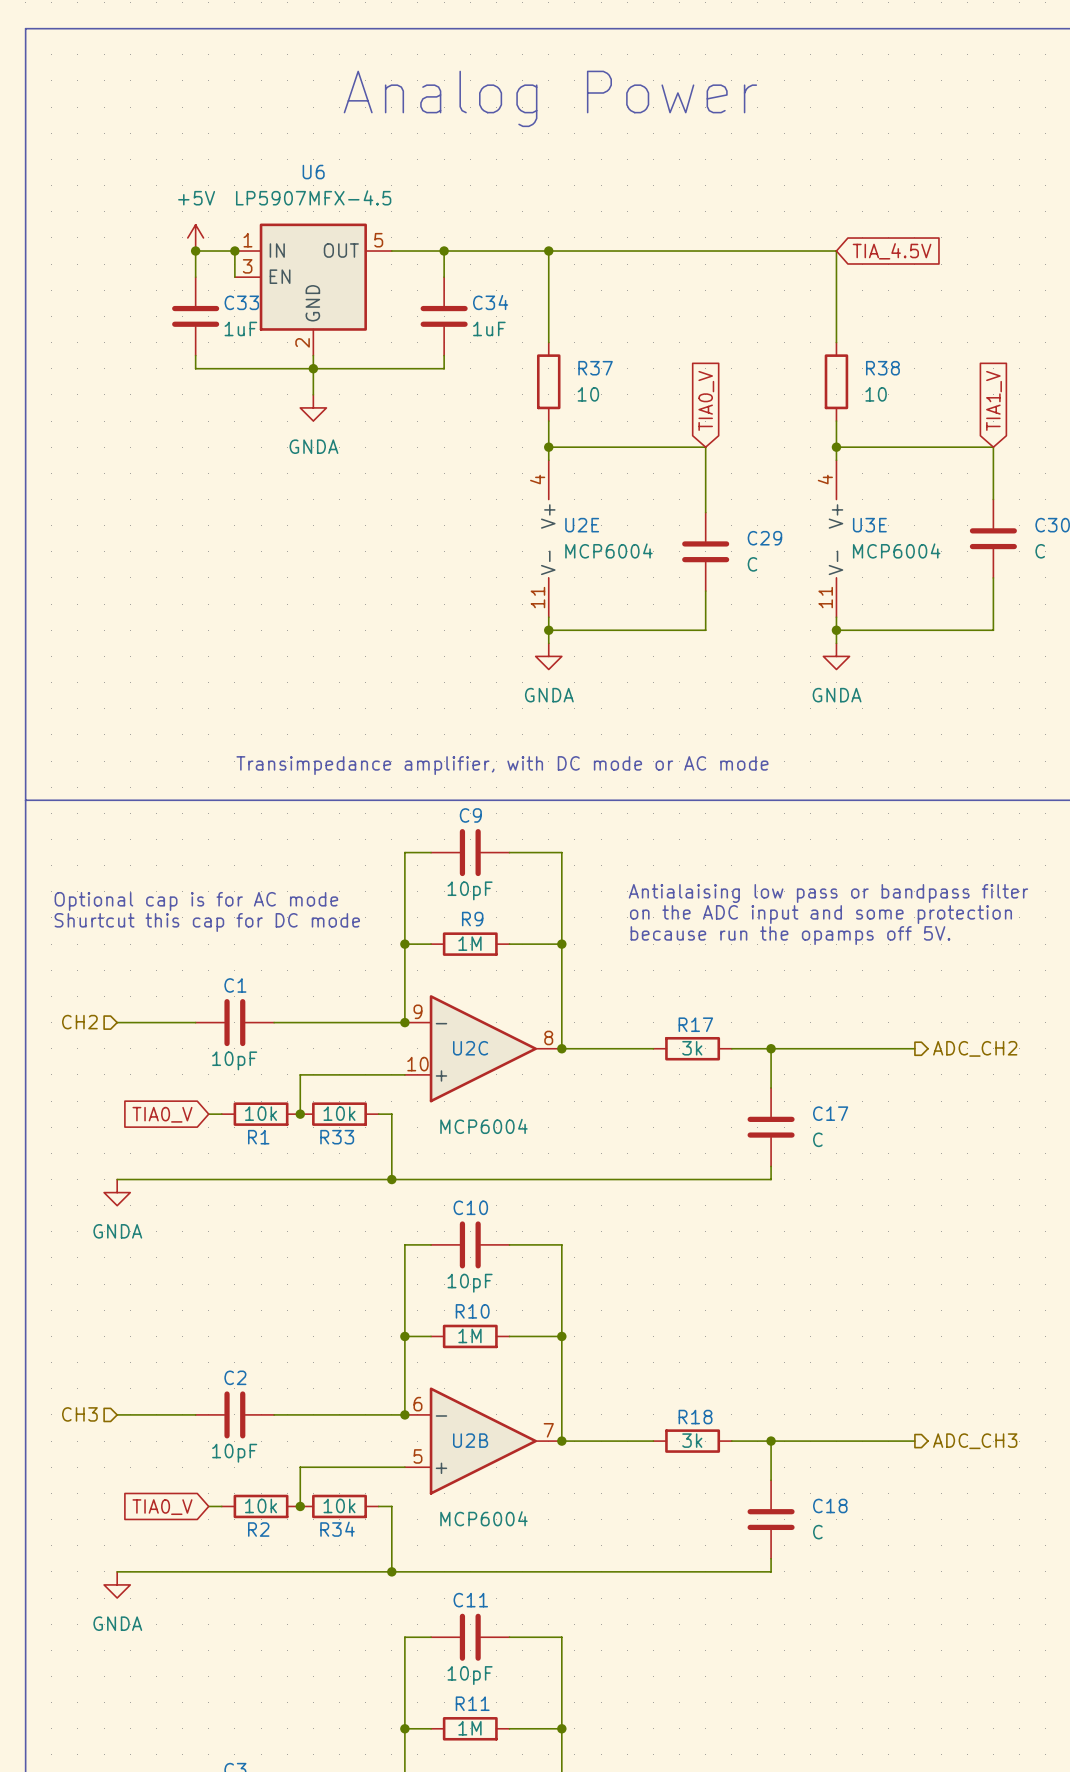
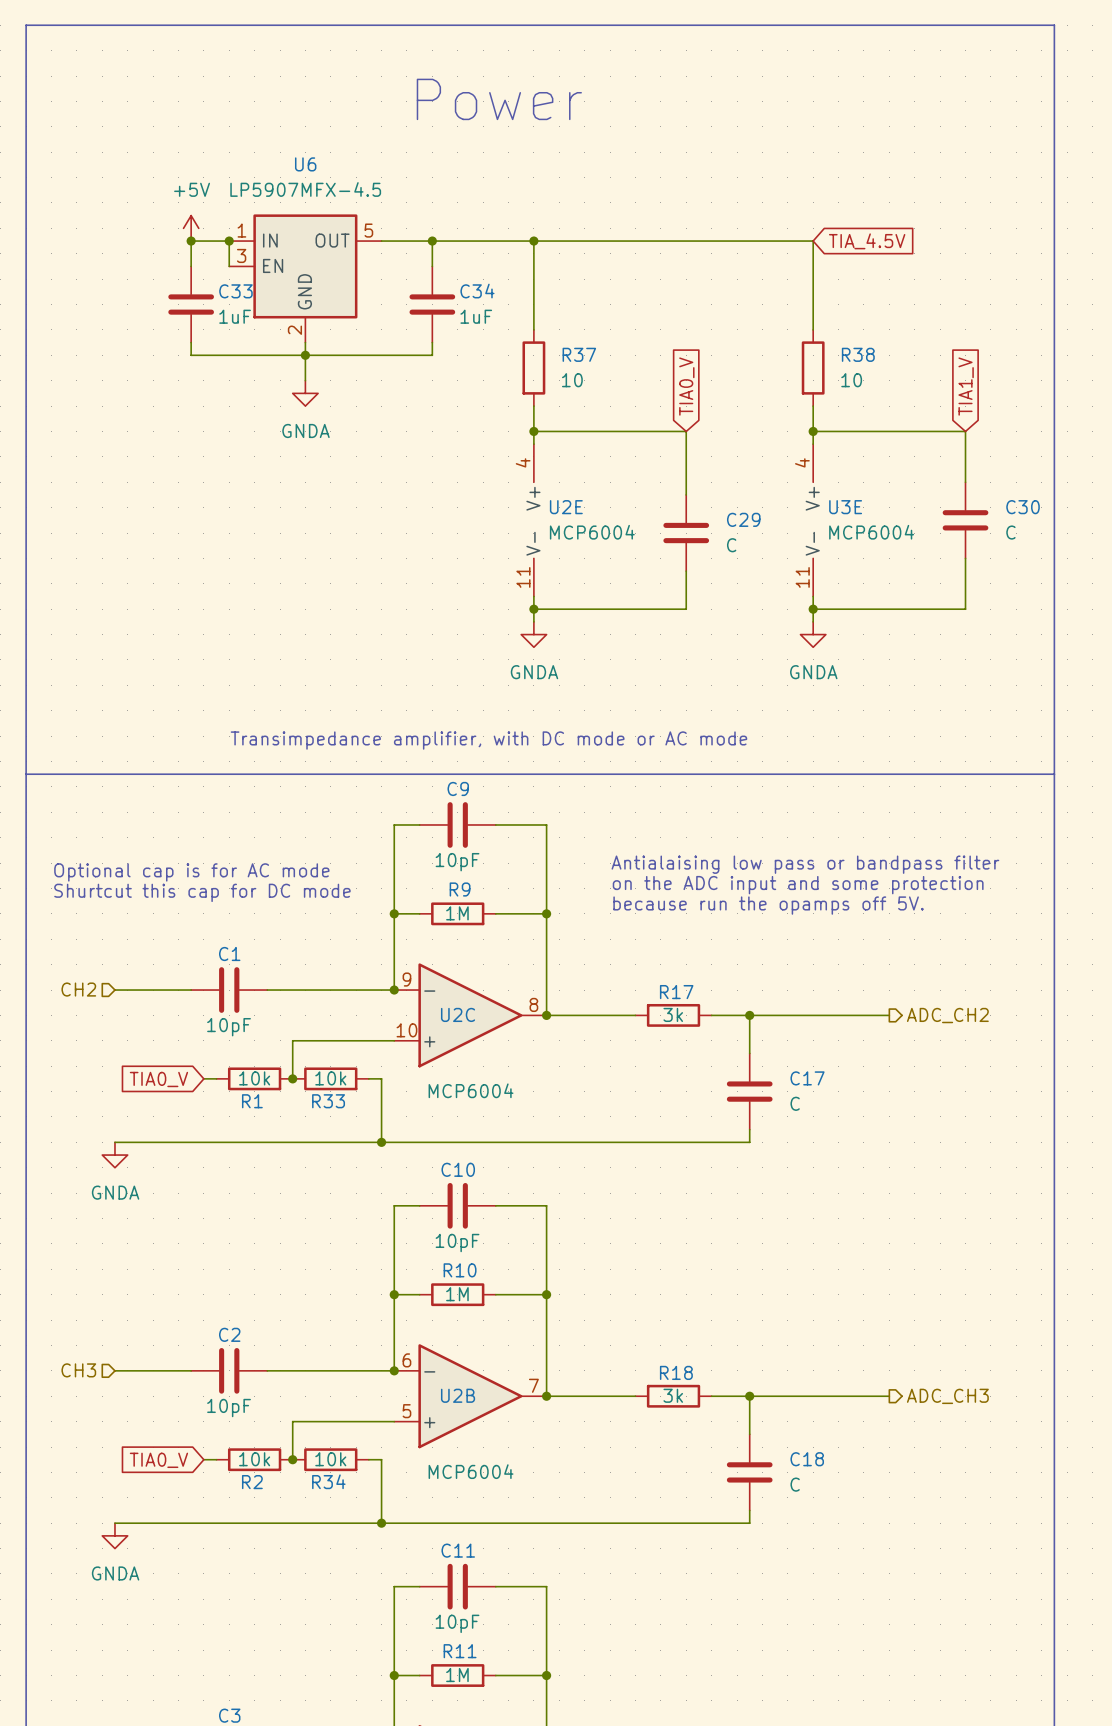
text: Analog Power (550, 98) -> none
text: none -> Power (499, 99)

